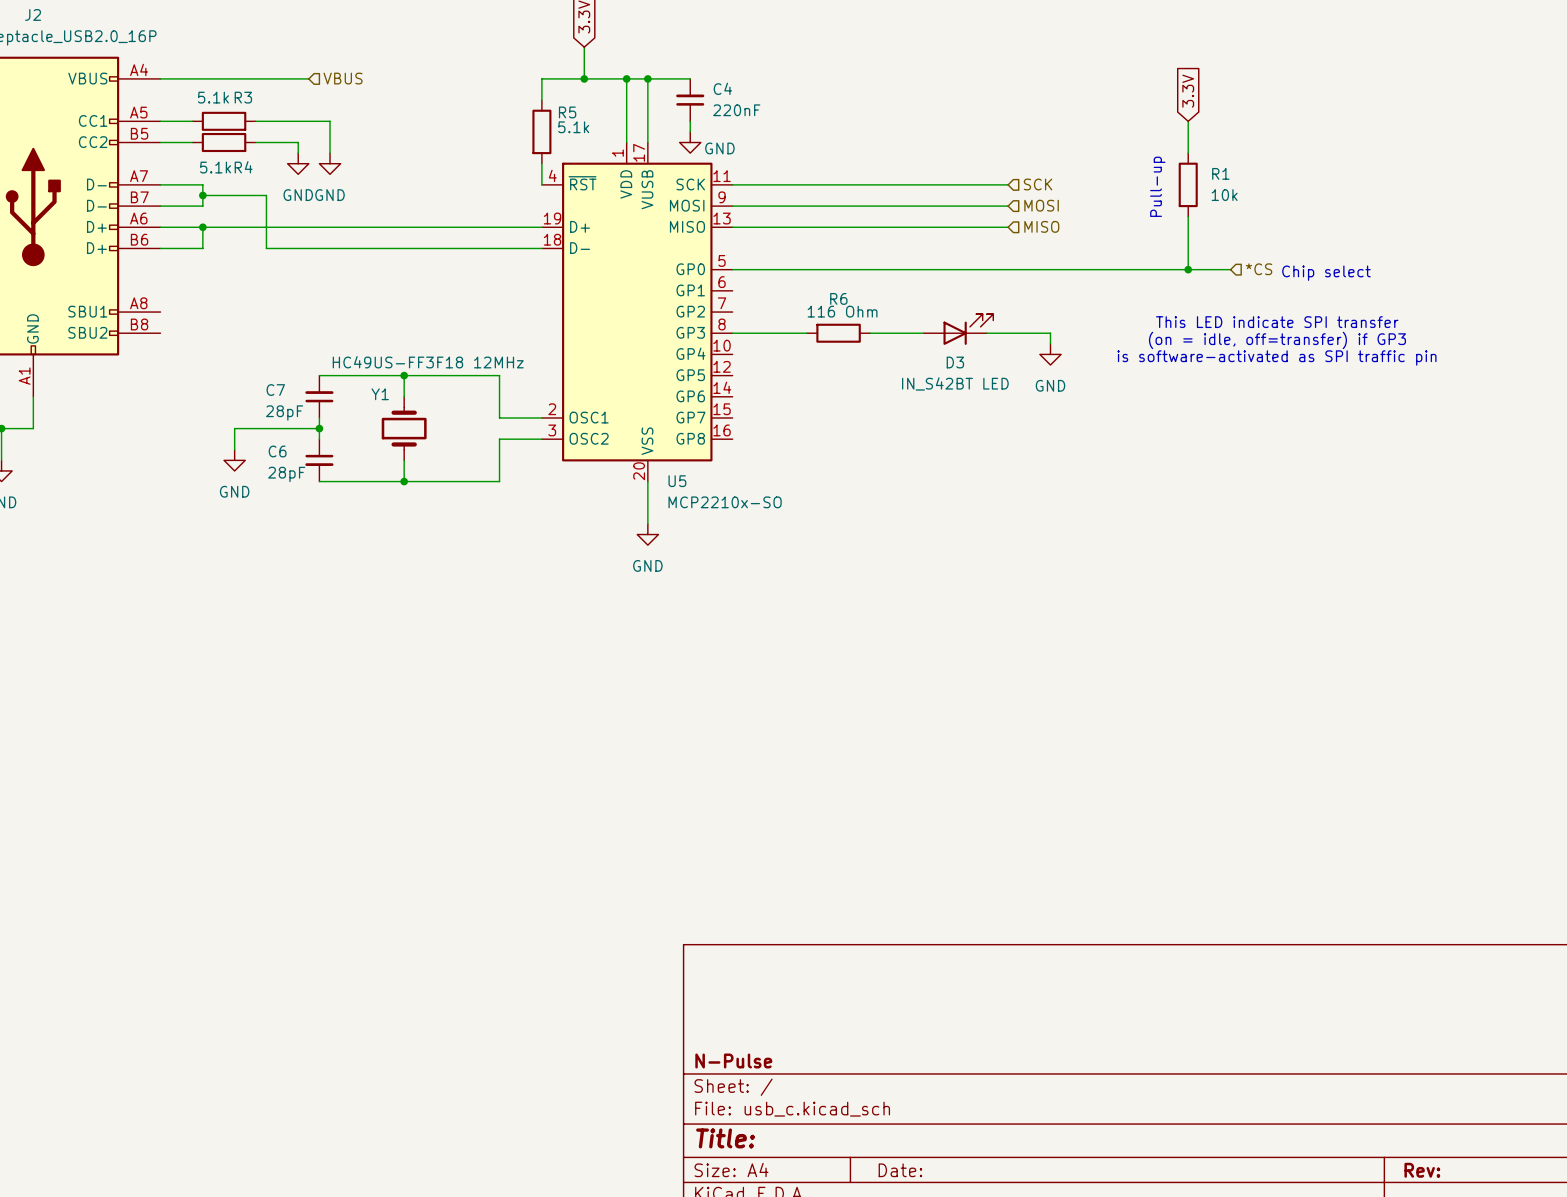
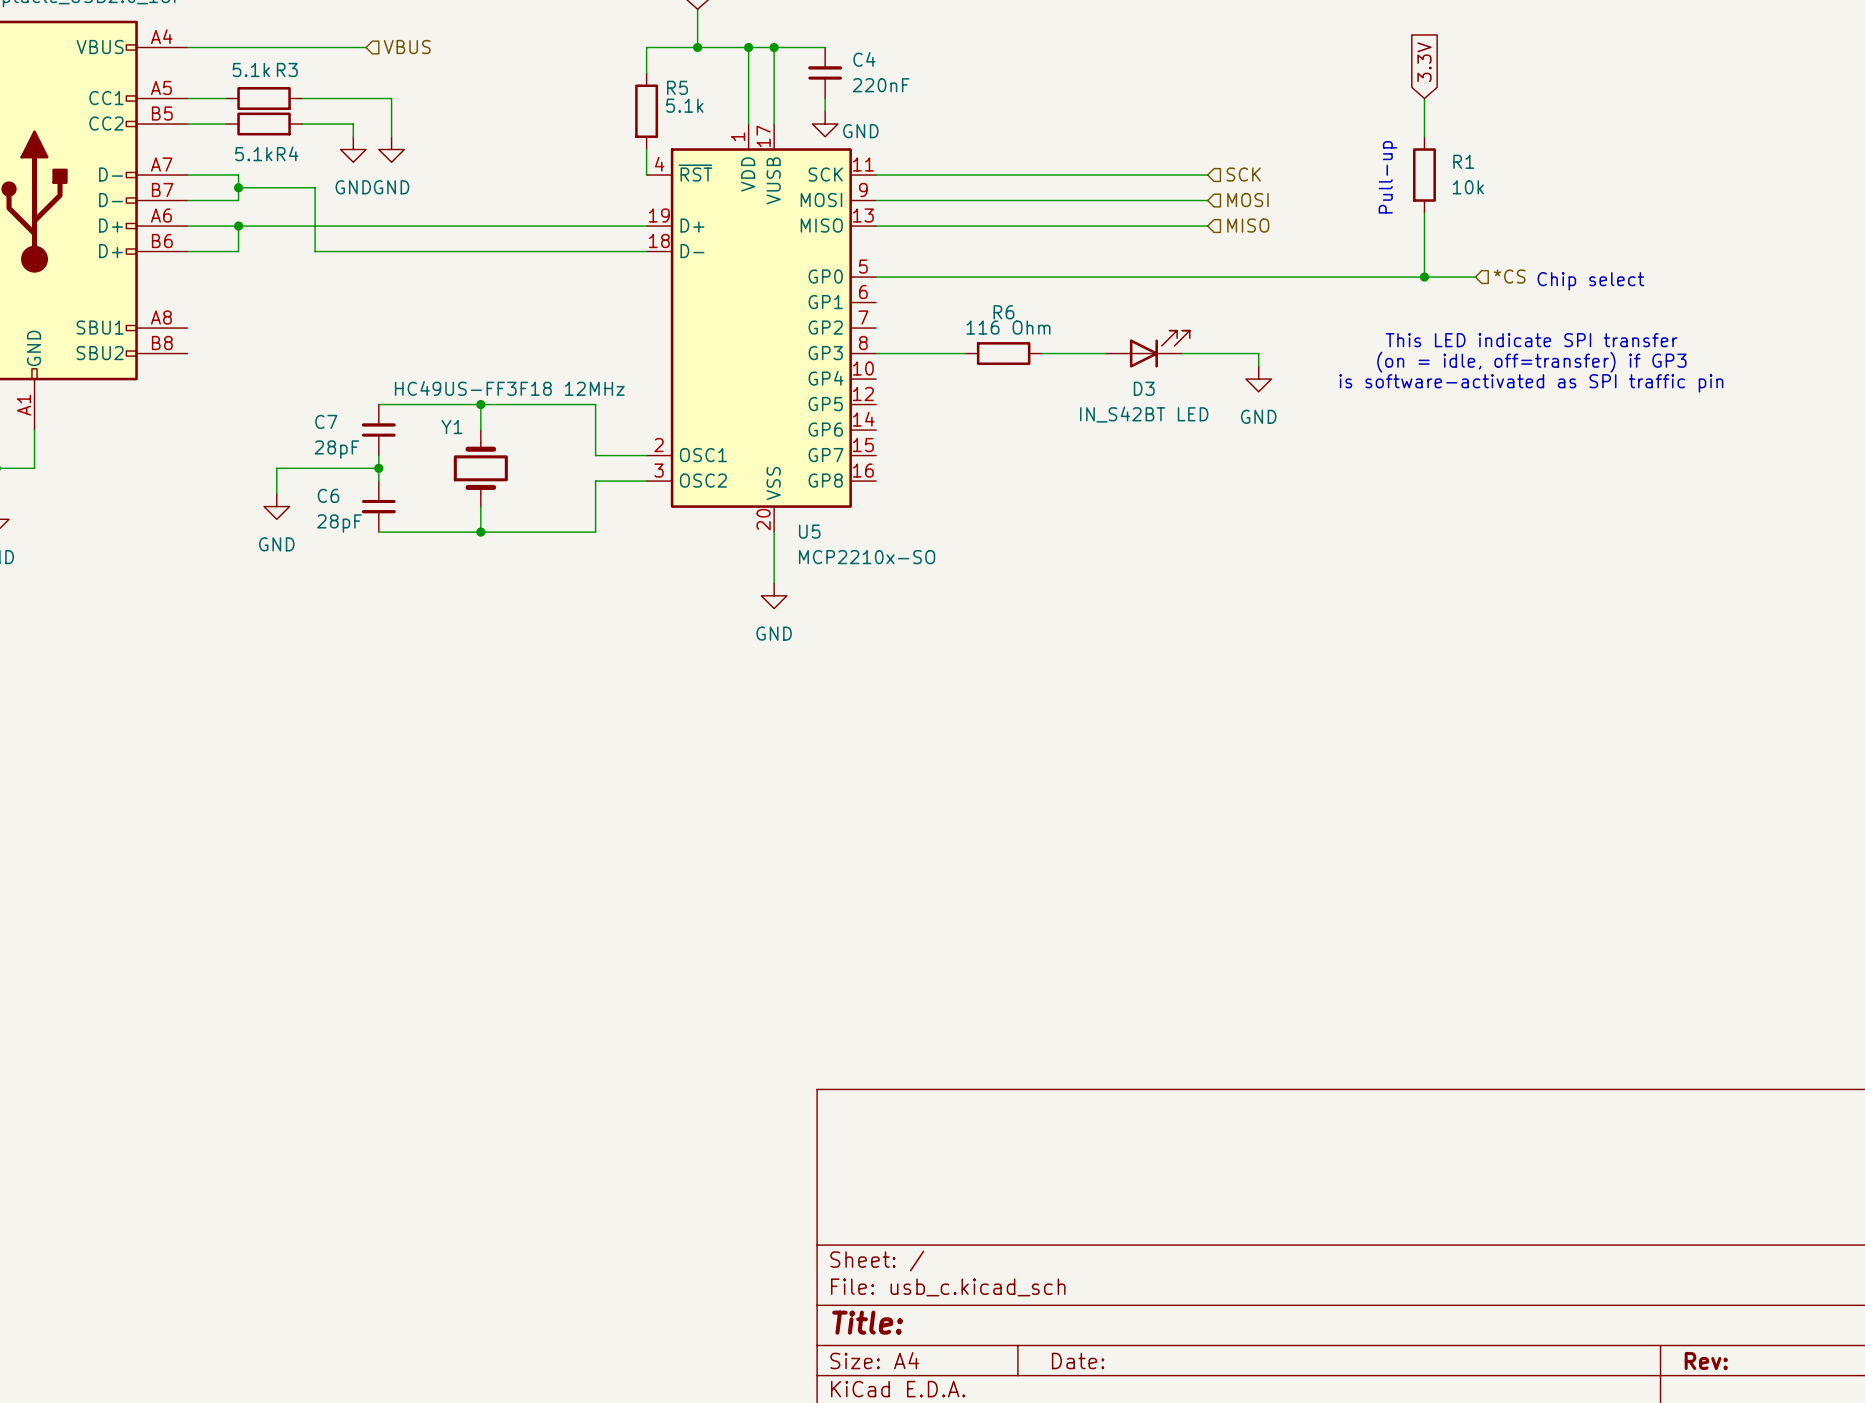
title block: N-Pulse (733, 1061) -> none

